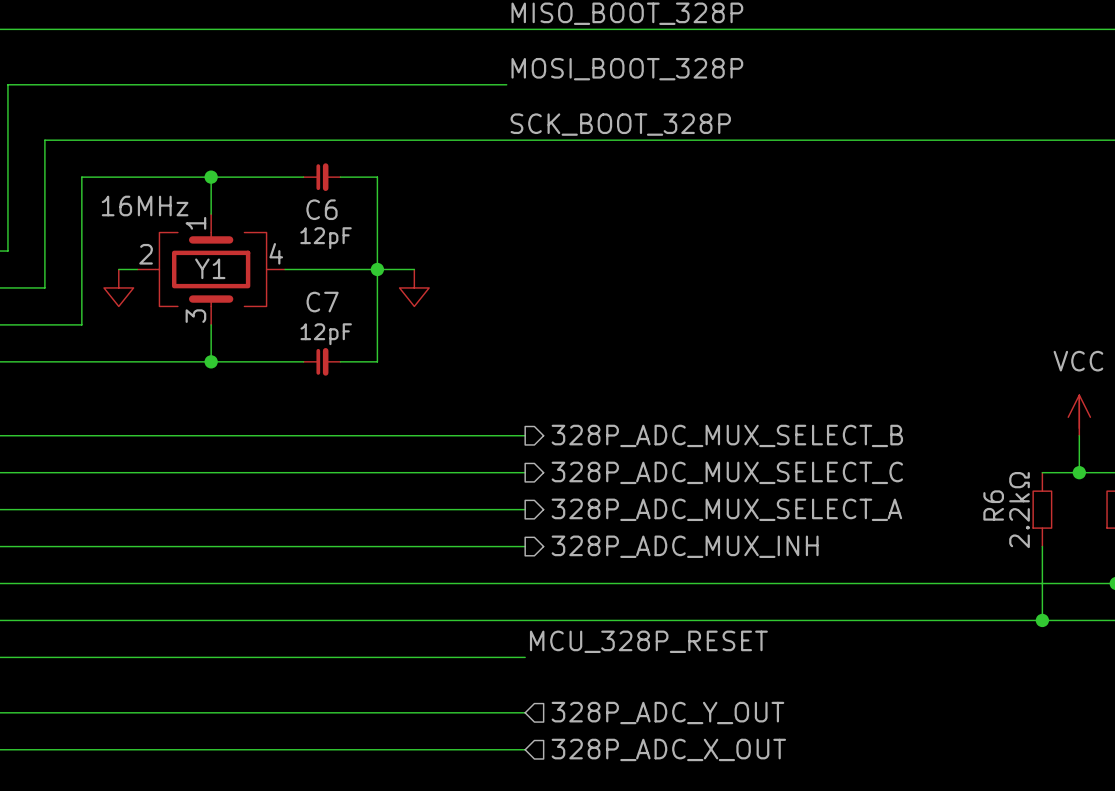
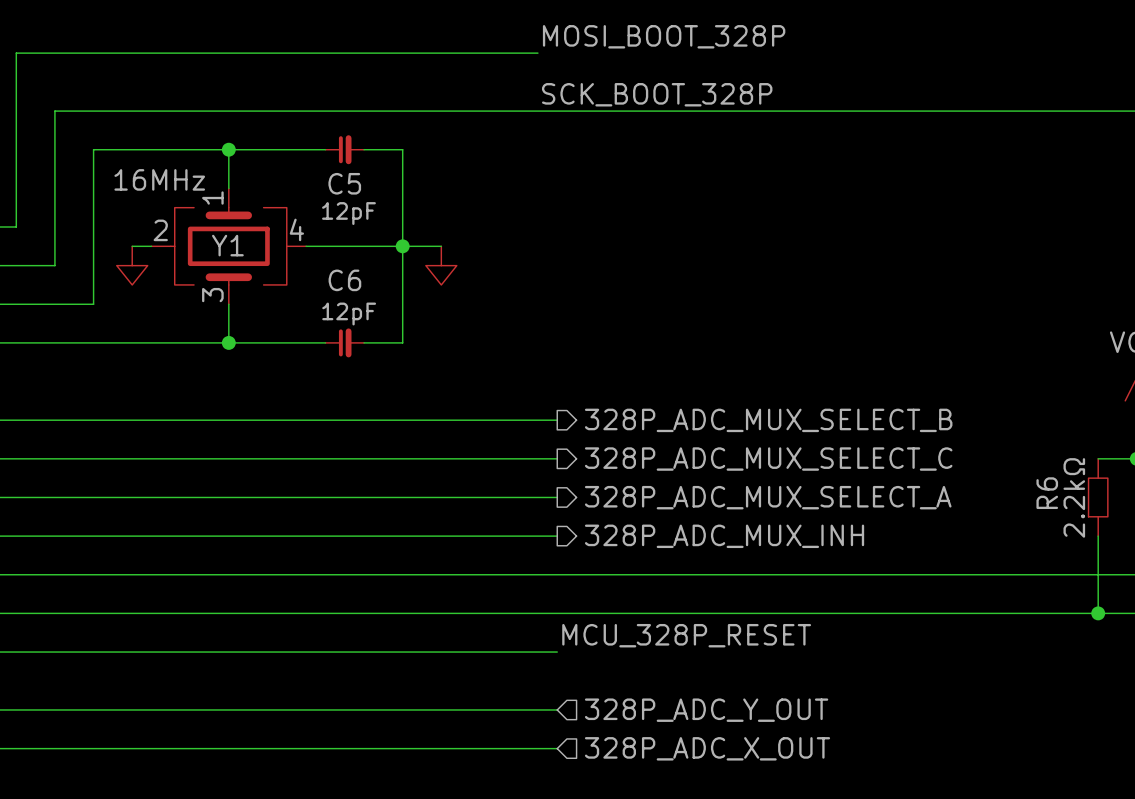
C6 name: C6 (321, 209) -> C5 (344, 183)
C7 name: C7 (322, 302) -> C6 (344, 280)

